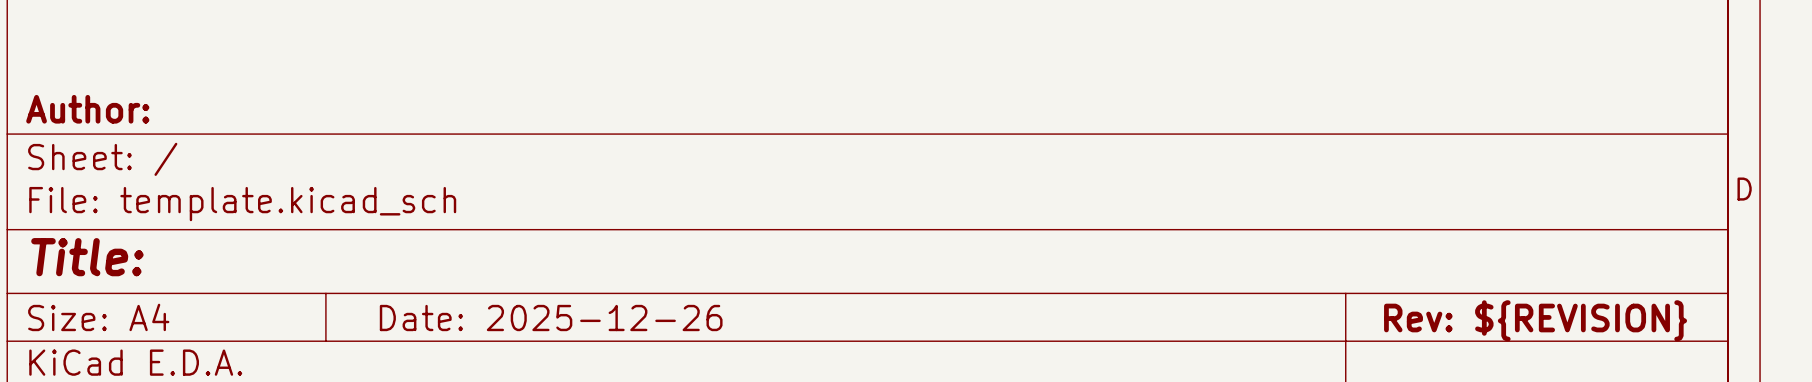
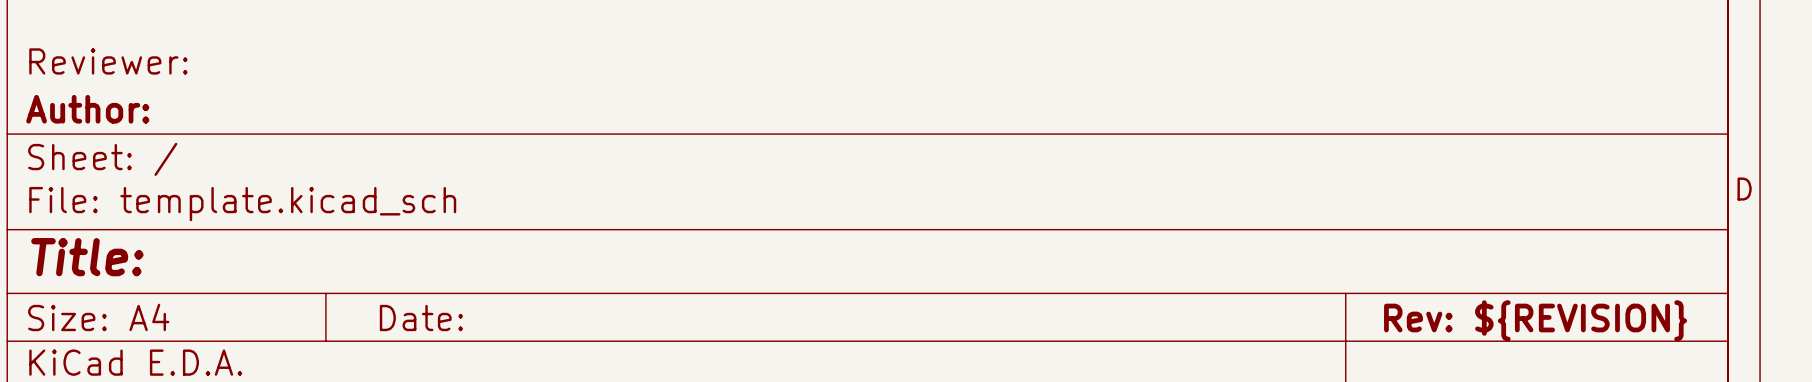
title block: none -> Reviewer: (108, 61)
title block: Date: 2025-12-26 (551, 318) -> Date: (421, 318)

